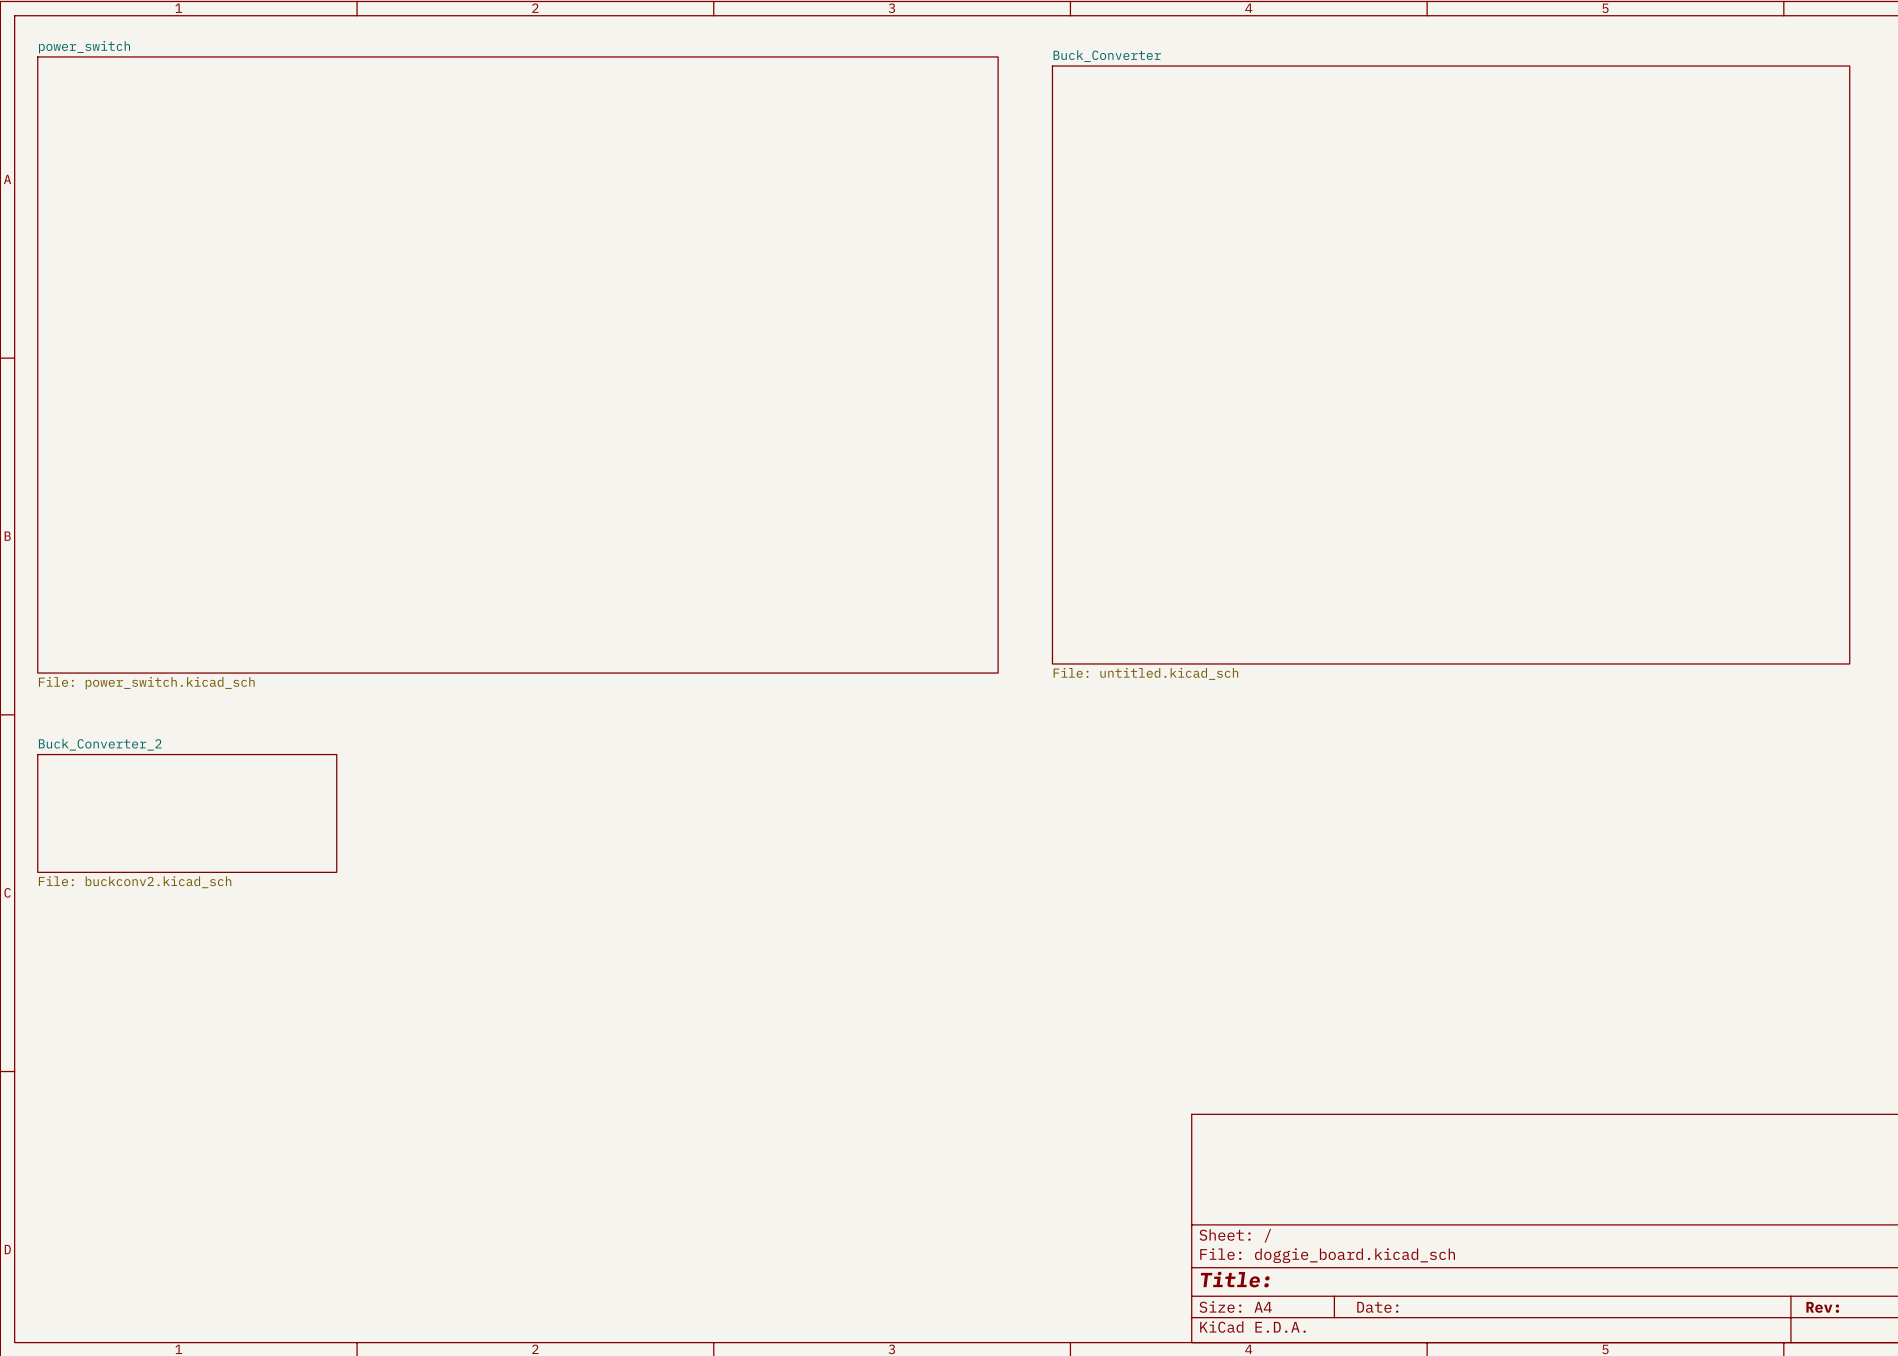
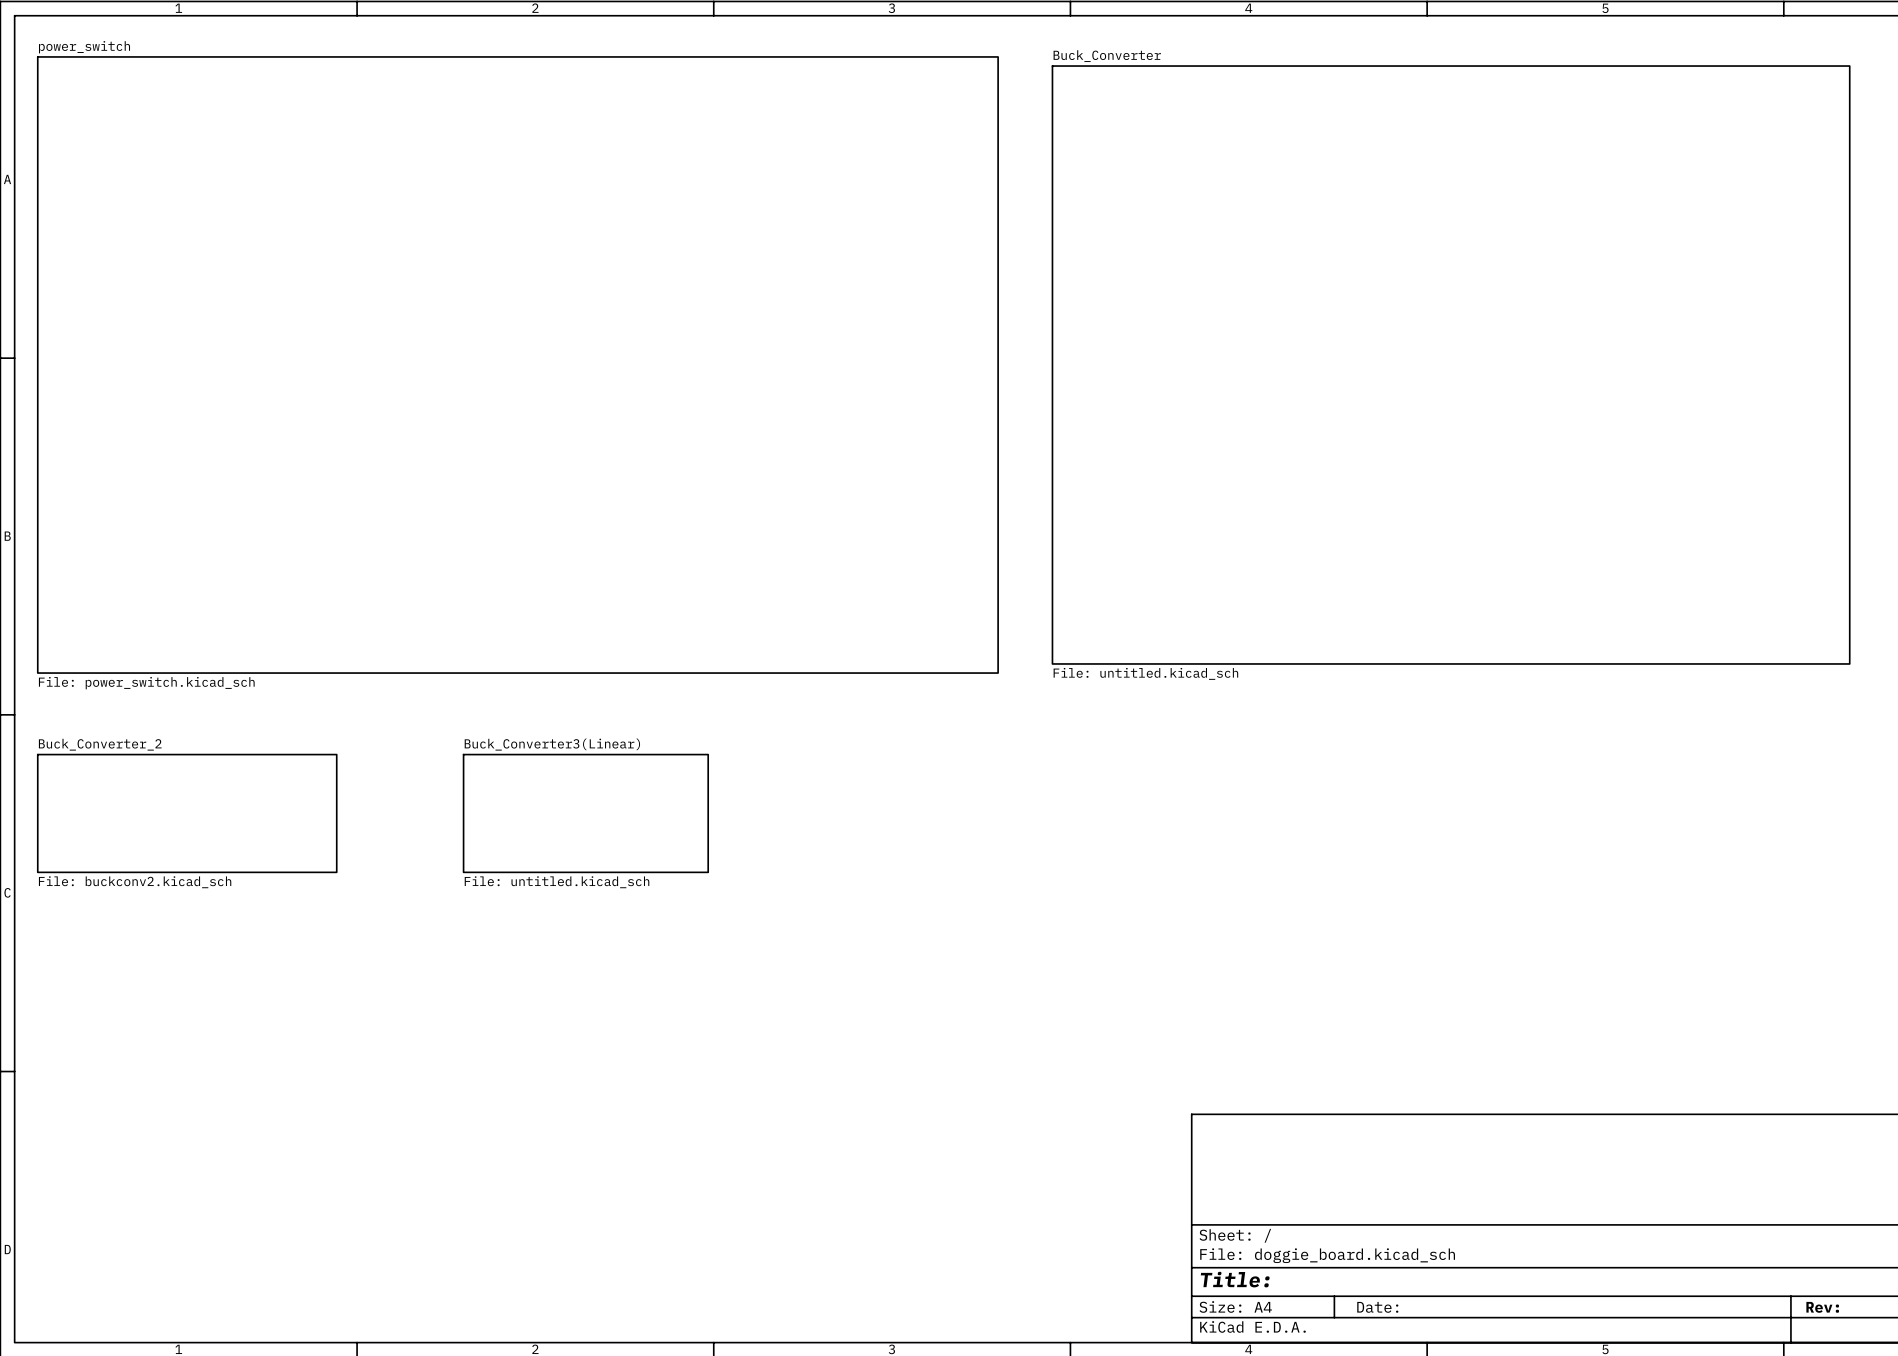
sheet Buck_Converter3(Linear): none -> File: untitled.kicad_sch (585, 813)

